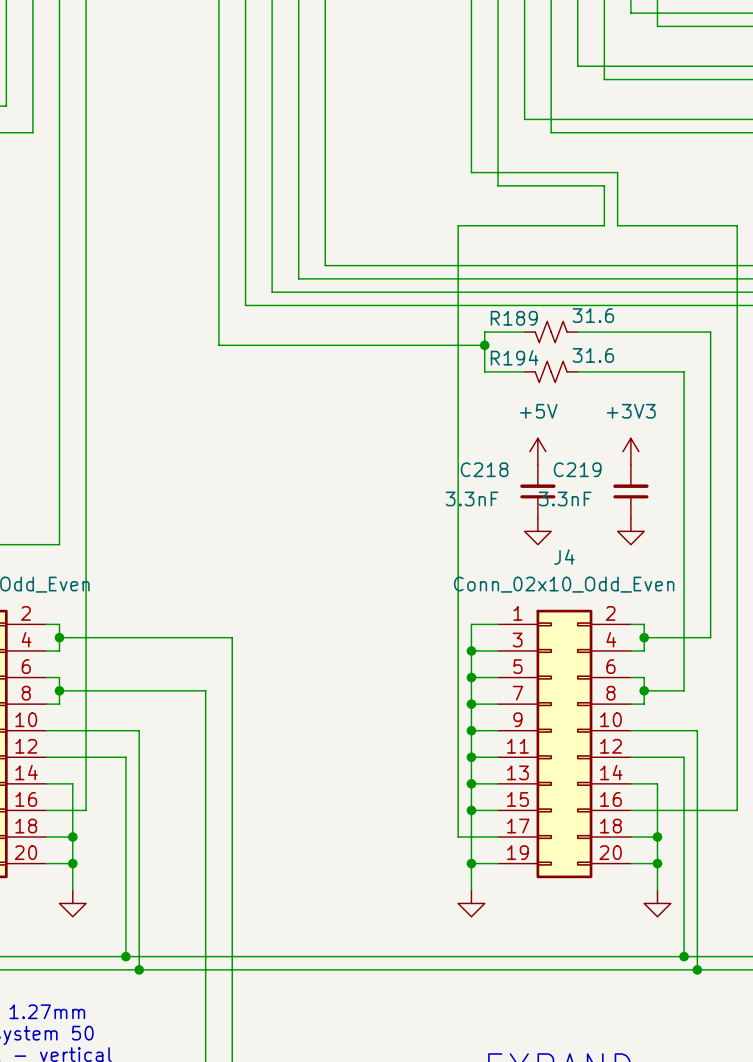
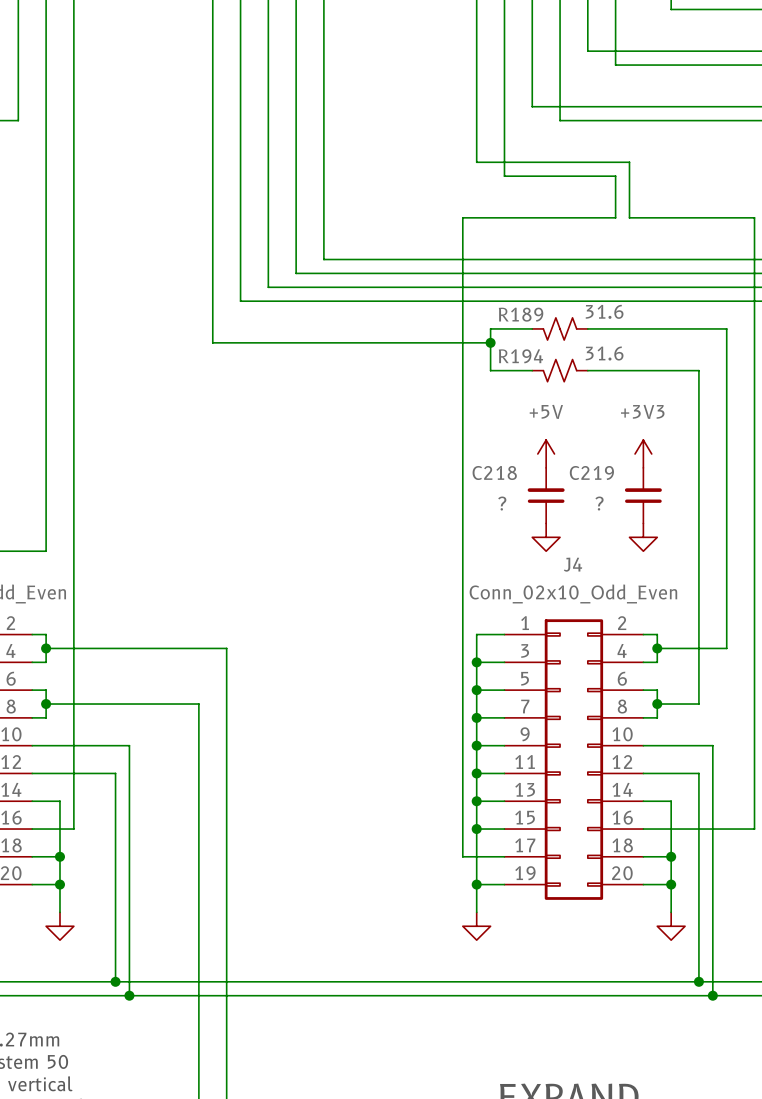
C218 value: 3.3nF (472, 498) -> ? (502, 503)
C219 value: 3.3nF (565, 498) -> ? (599, 503)

